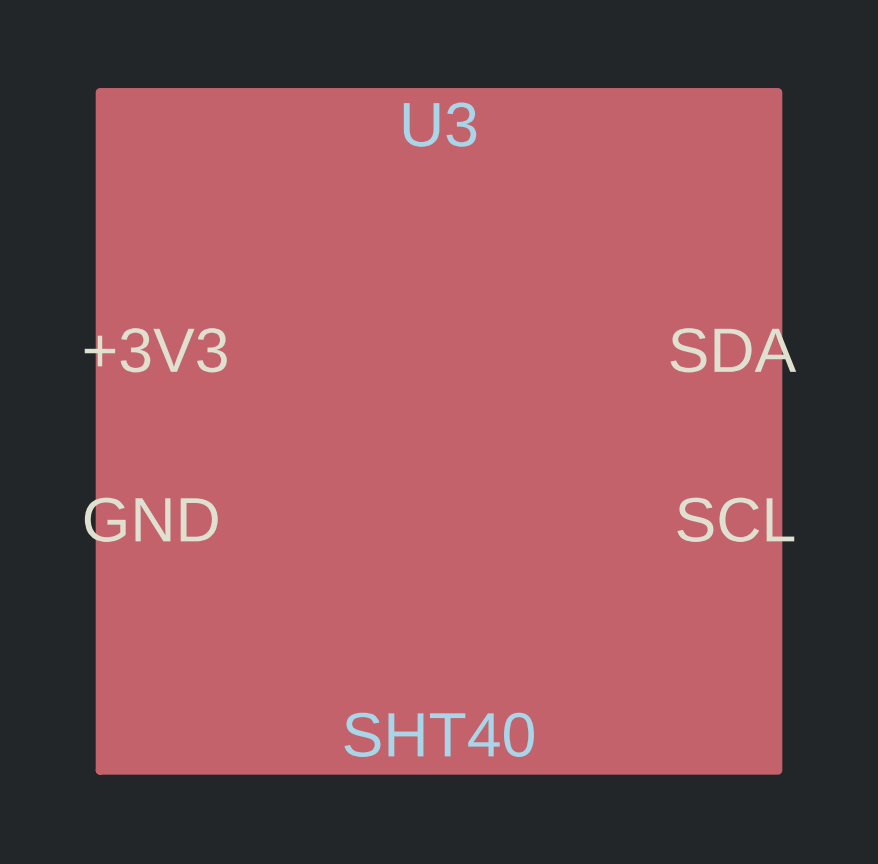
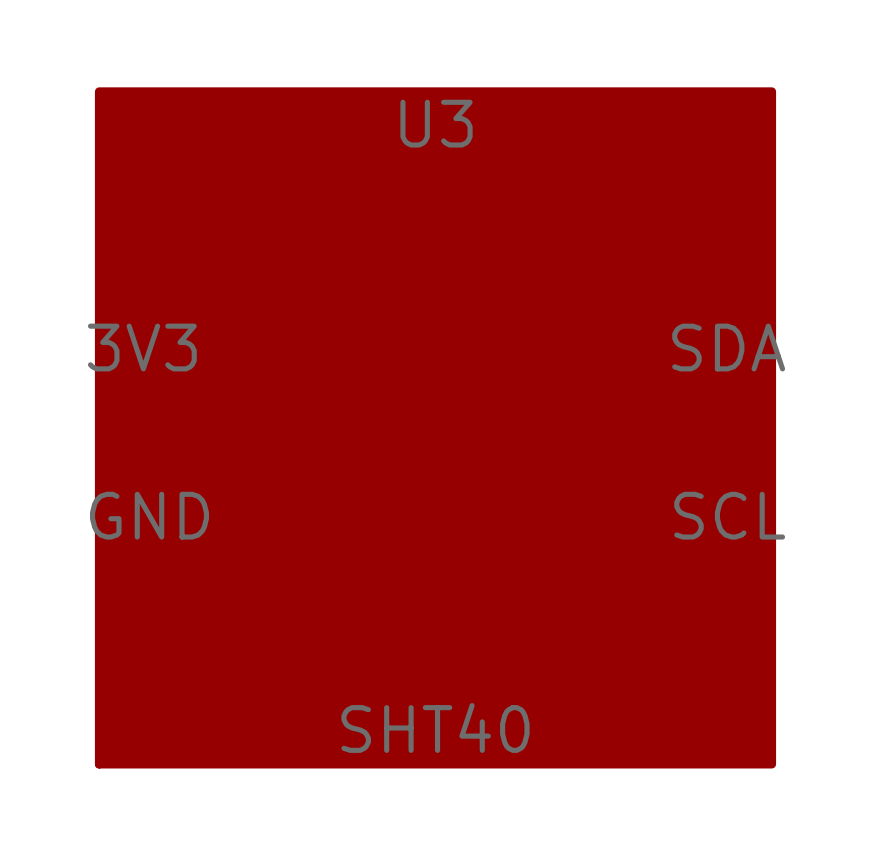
label: +3V3 (155, 350) -> 3V3 (142, 347)

